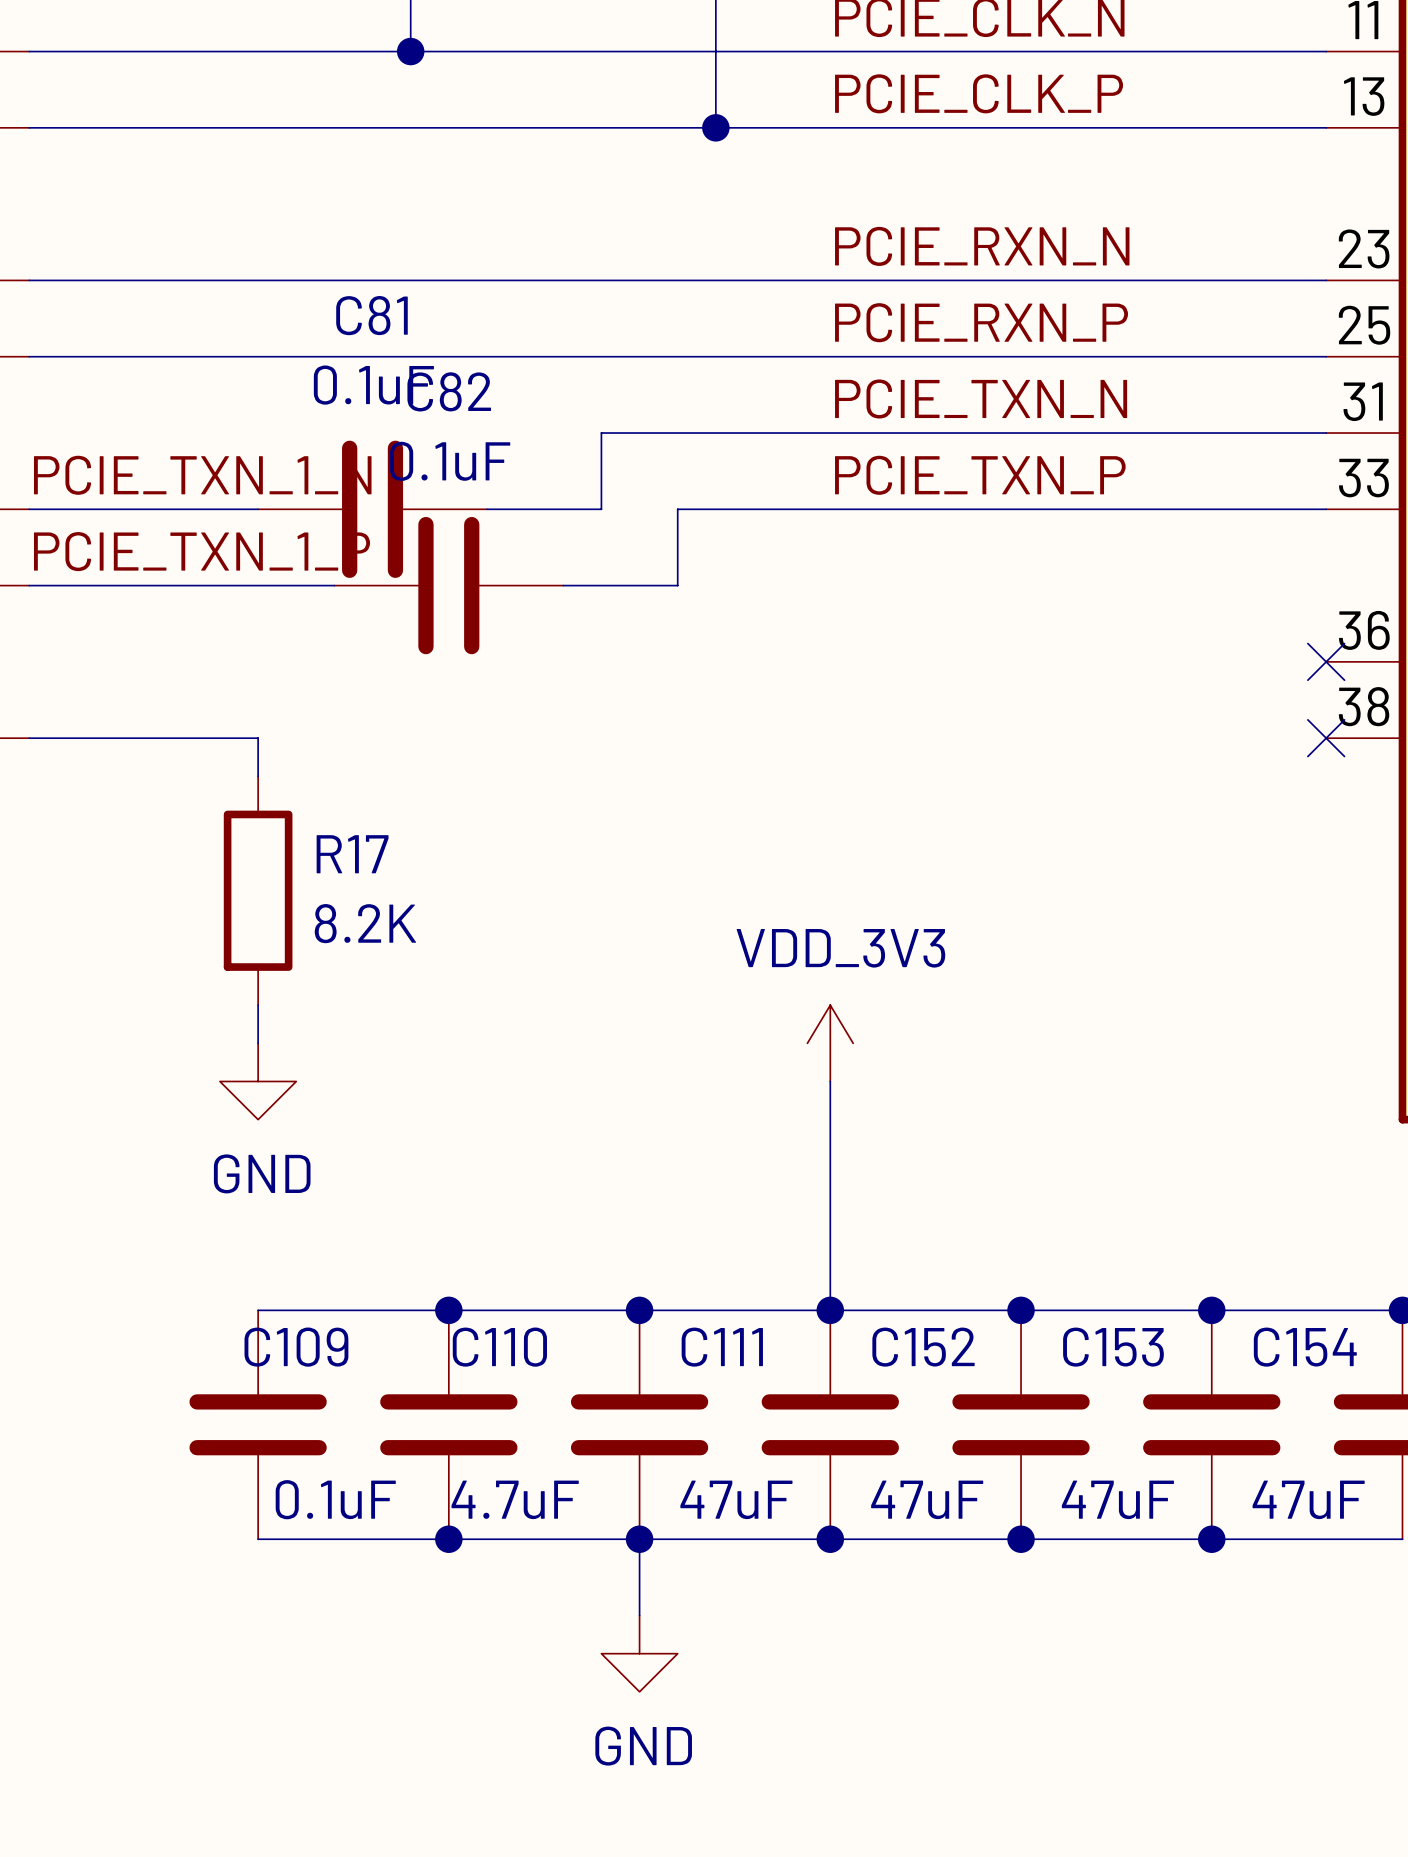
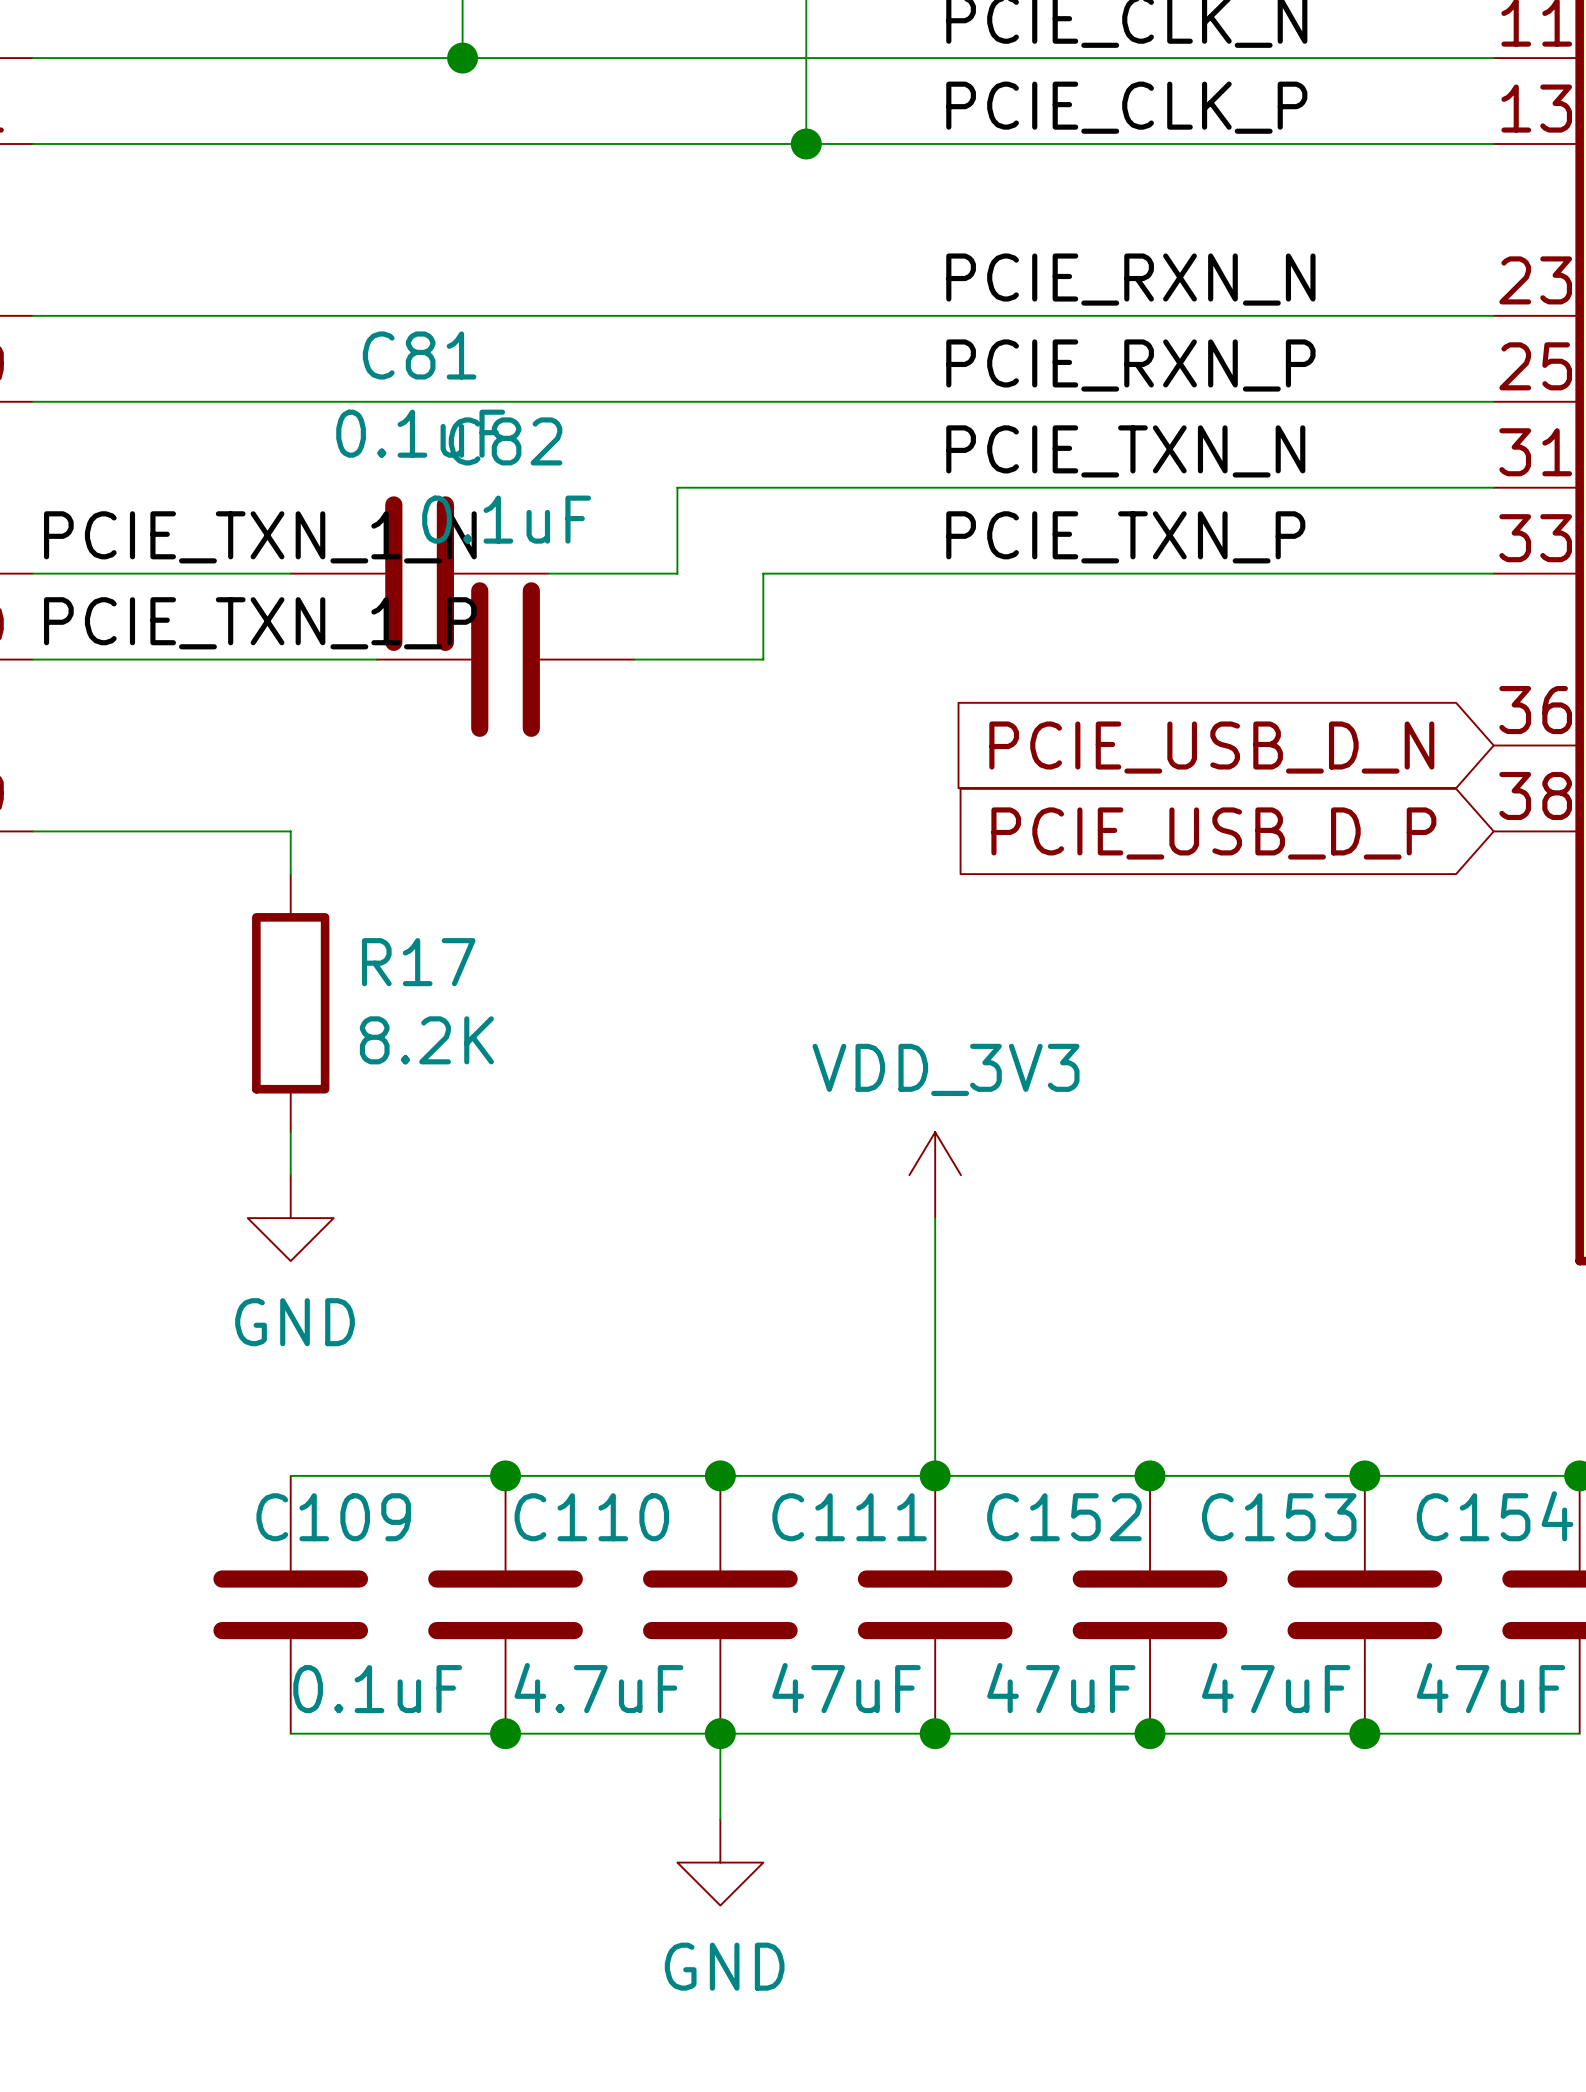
global label: none -> PCIE_USB_D_N (1211, 747)
no-connect mark: (1326, 661) -> none
global label: none -> PCIE_USB_D_P (1213, 833)
no-connect mark: (1326, 738) -> none

